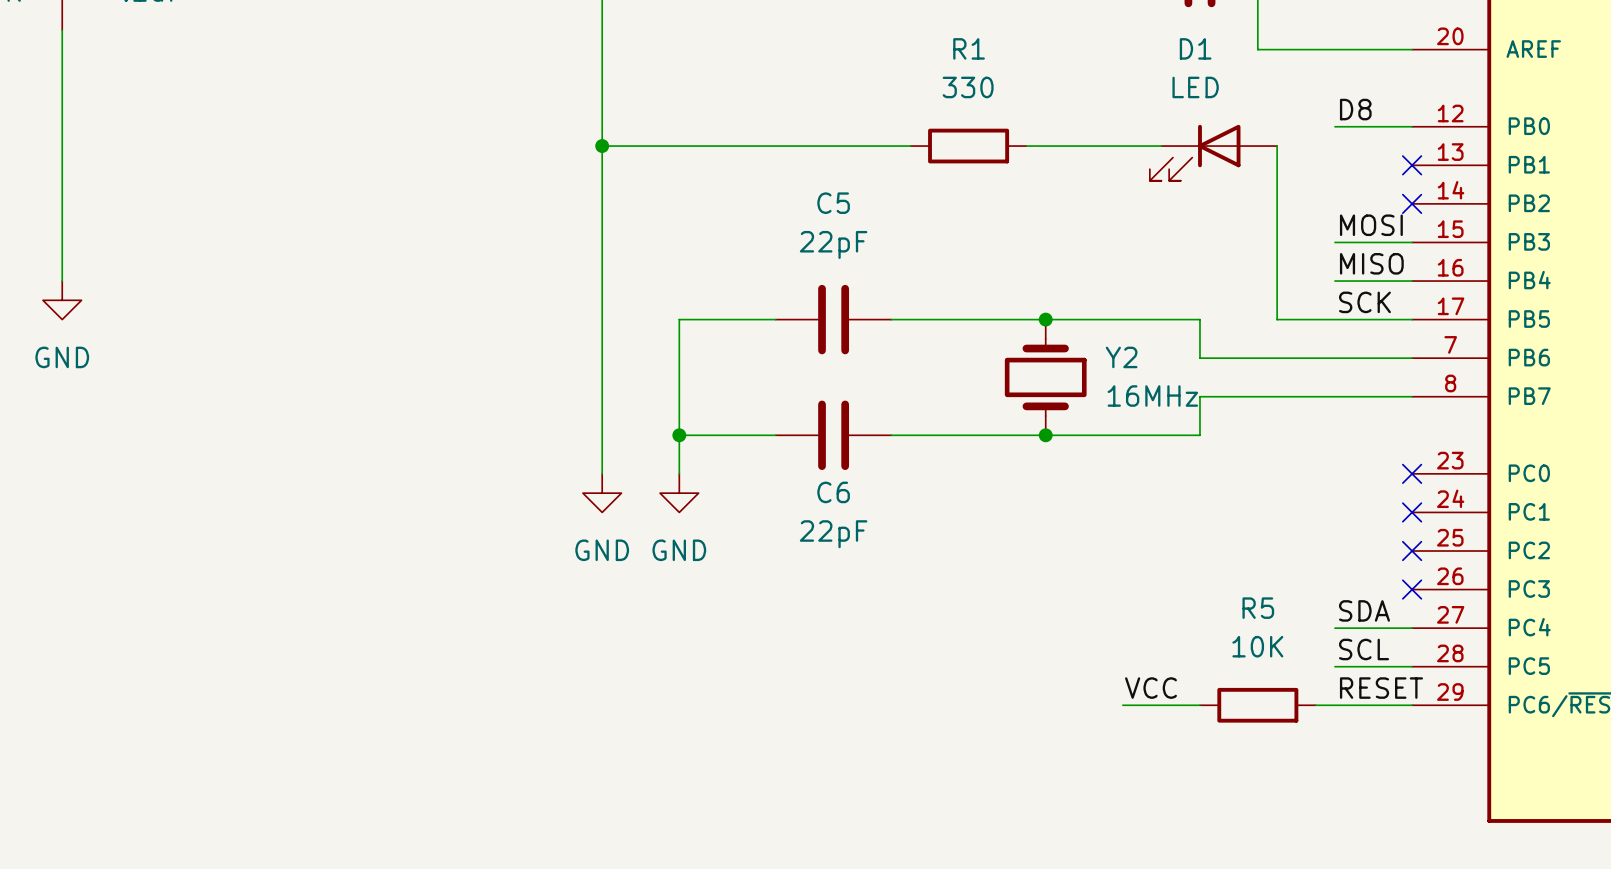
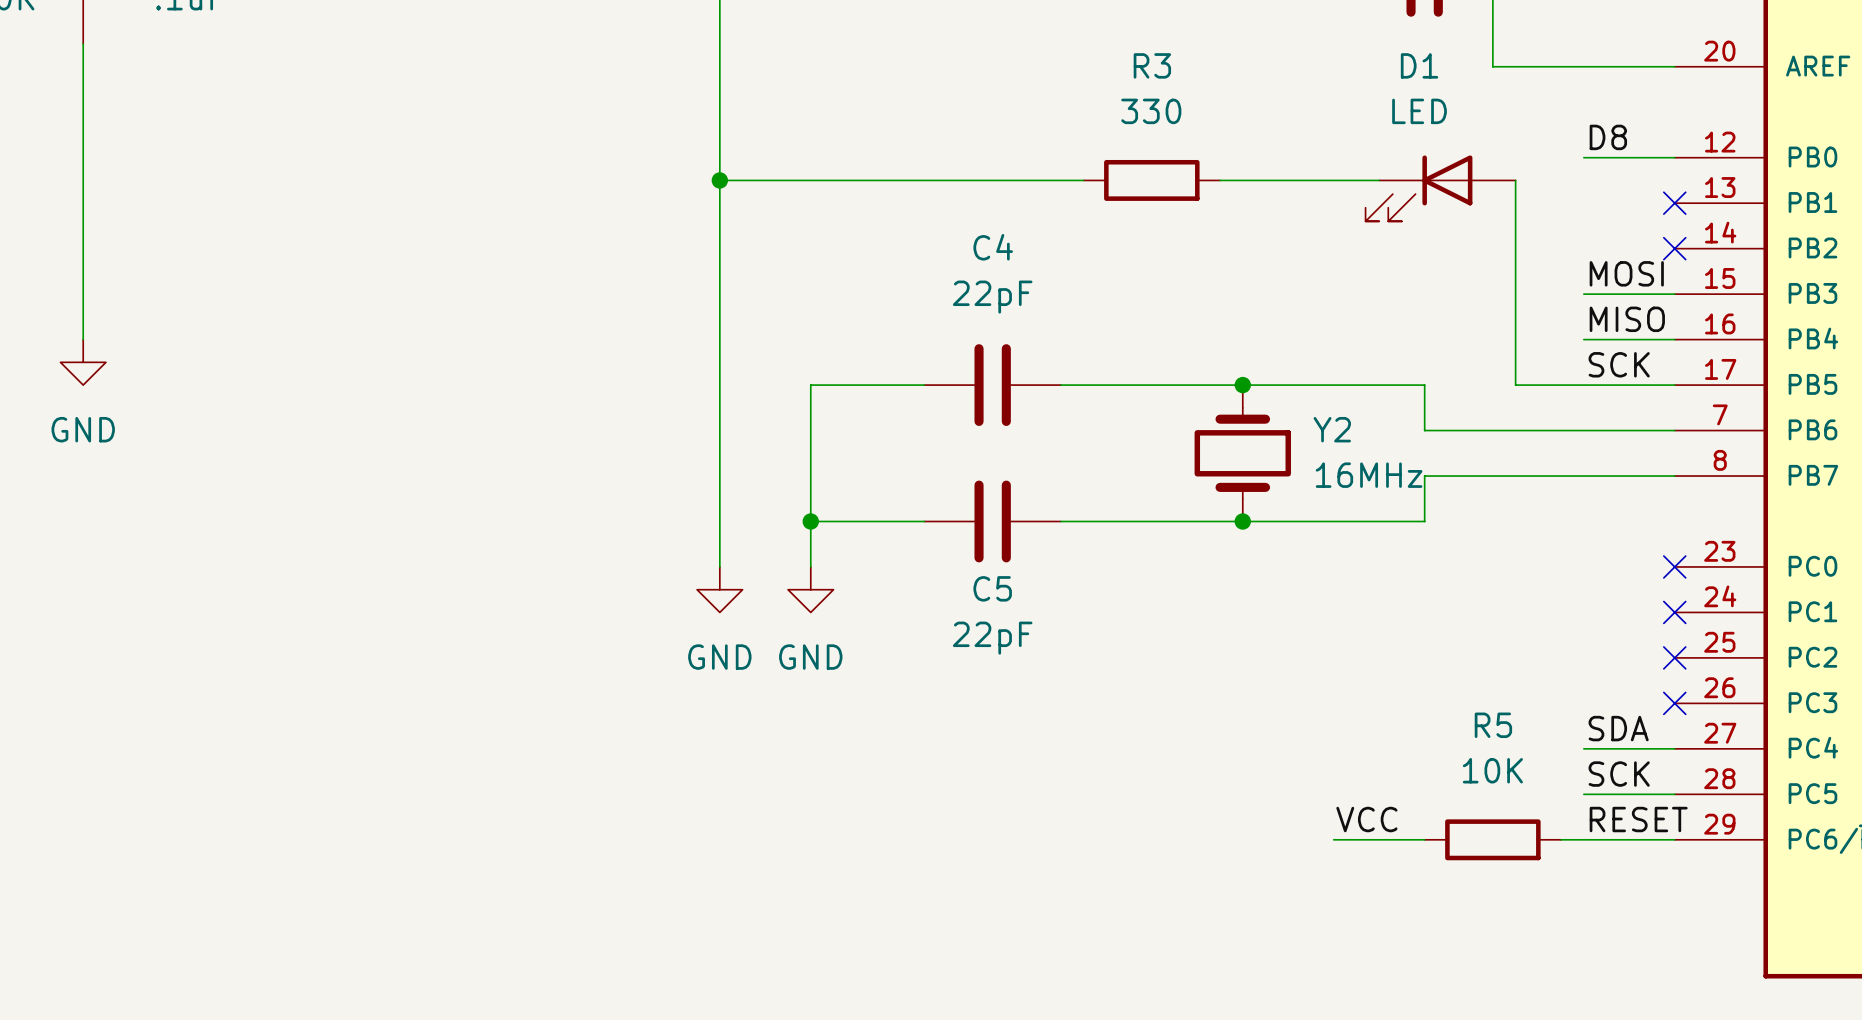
R1 name: R1 (969, 48) -> R3 (1152, 65)
C5 name: C5 (833, 203) -> C4 (993, 247)
C6 name: C6 (833, 492) -> C5 (992, 588)
label: SCL (1364, 649) -> SCK (1619, 774)

